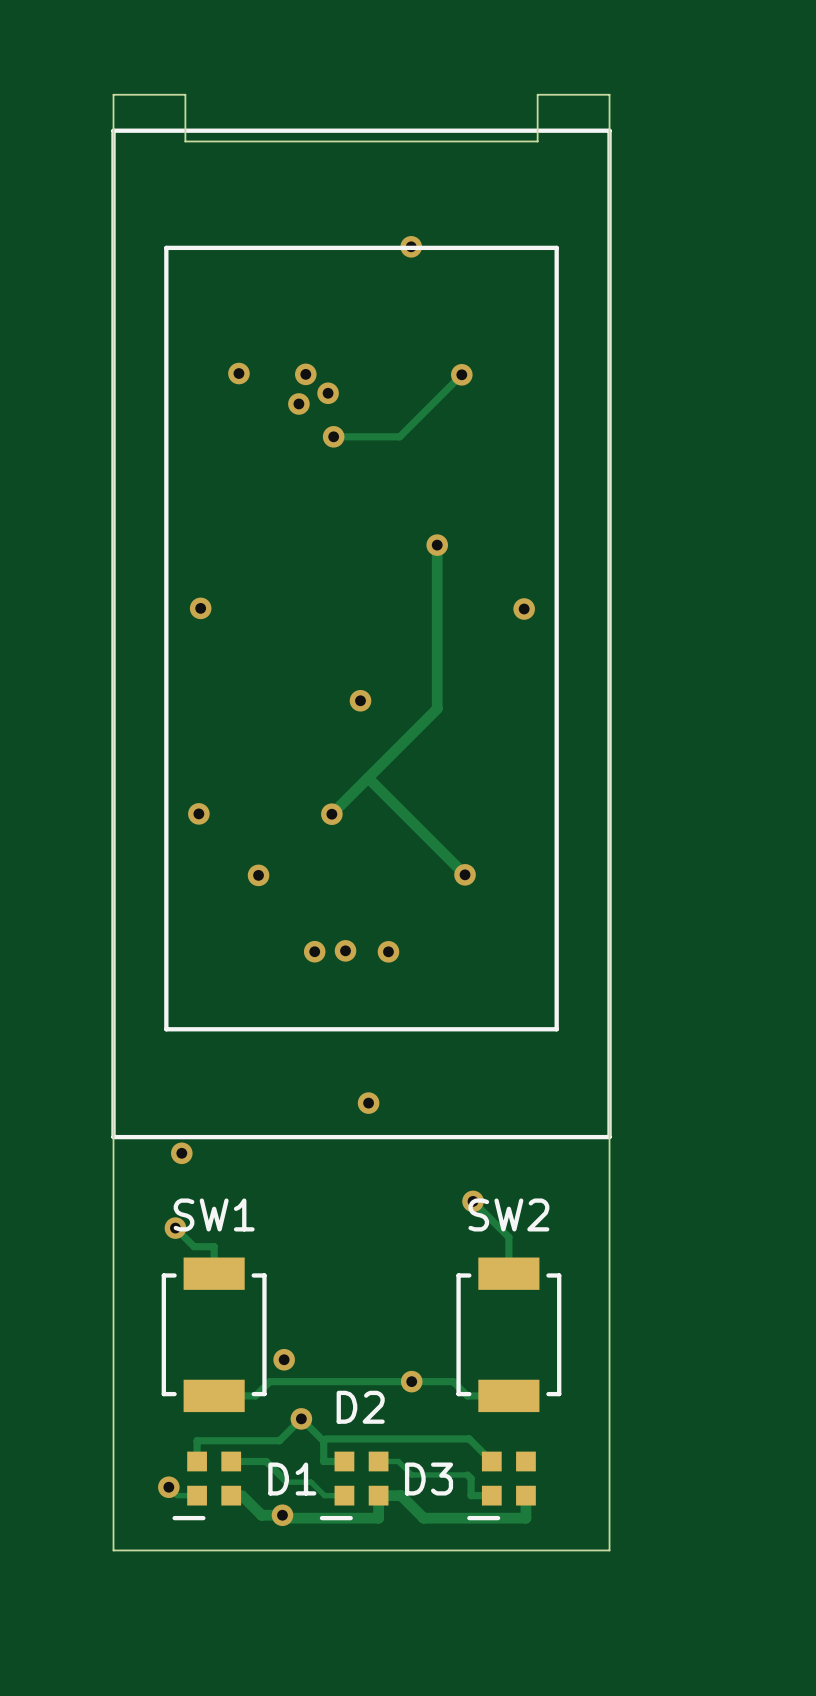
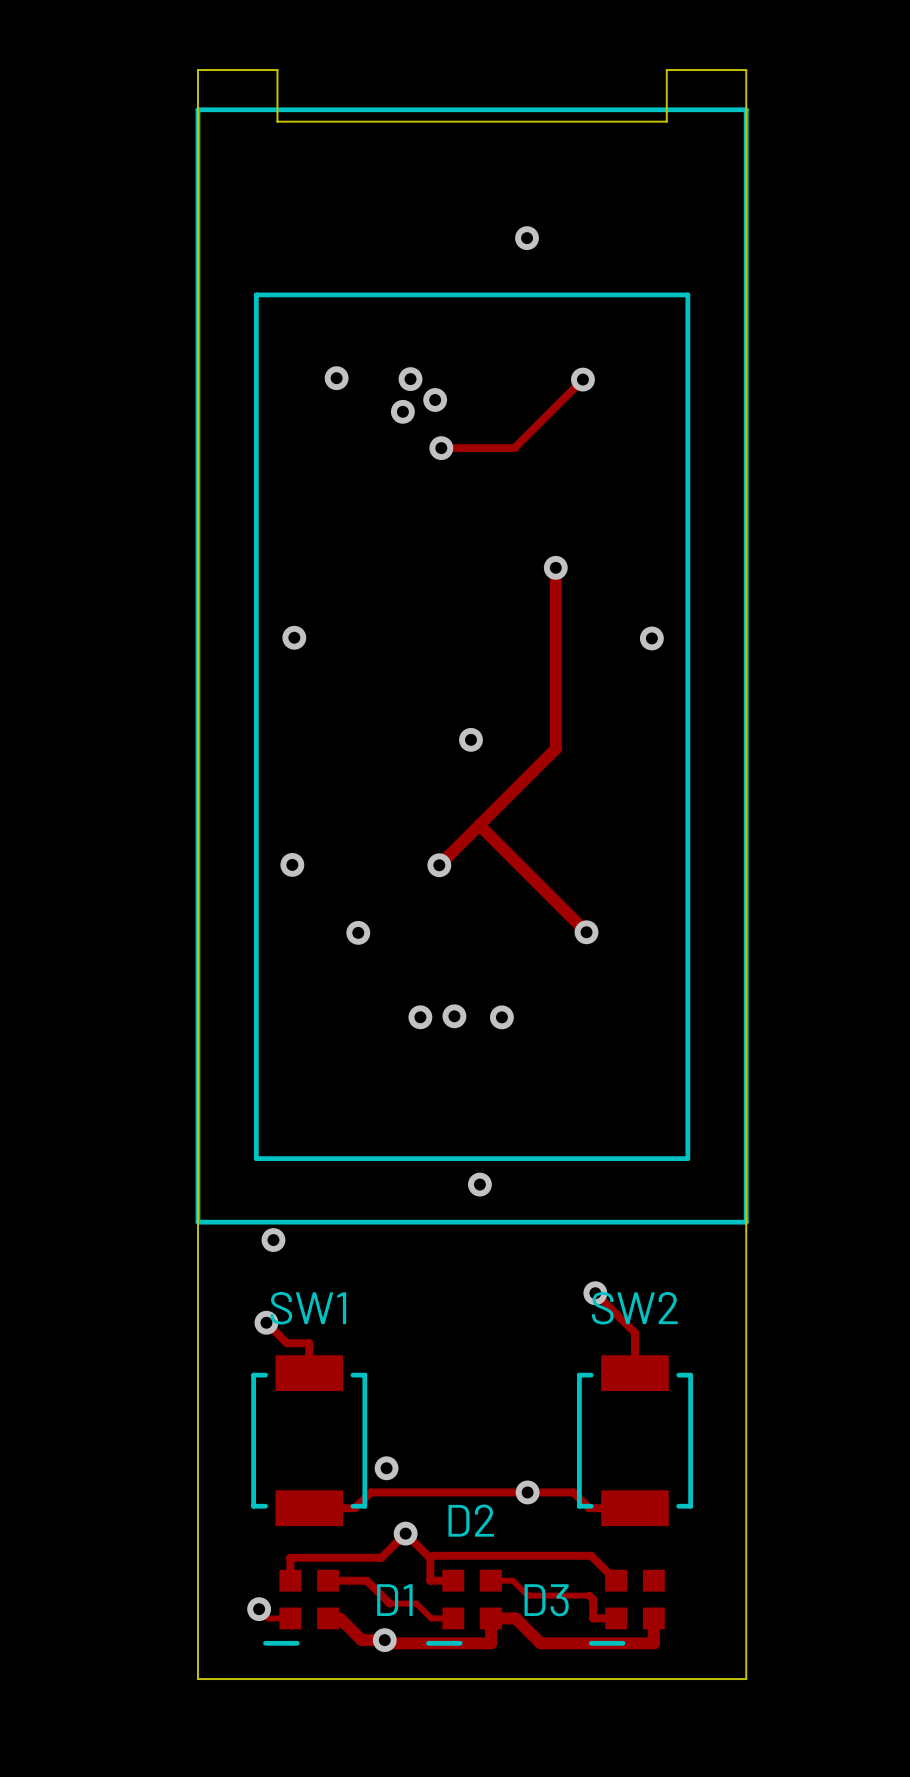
line: (166, 298) (166, 247) (556, 247) (556, 298) -> (256, 294) (687, 294)
line: (166, 1029) (556, 1029) -> (256, 1102) (256, 1158) (687, 1158) (687, 1102)

